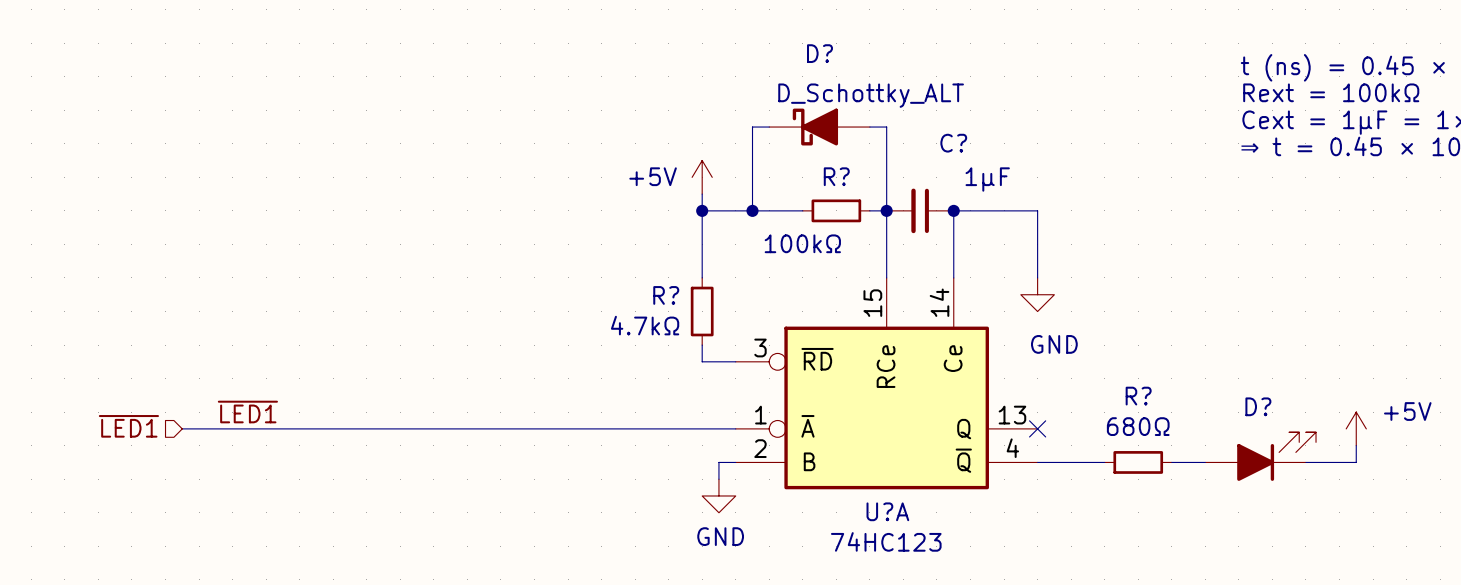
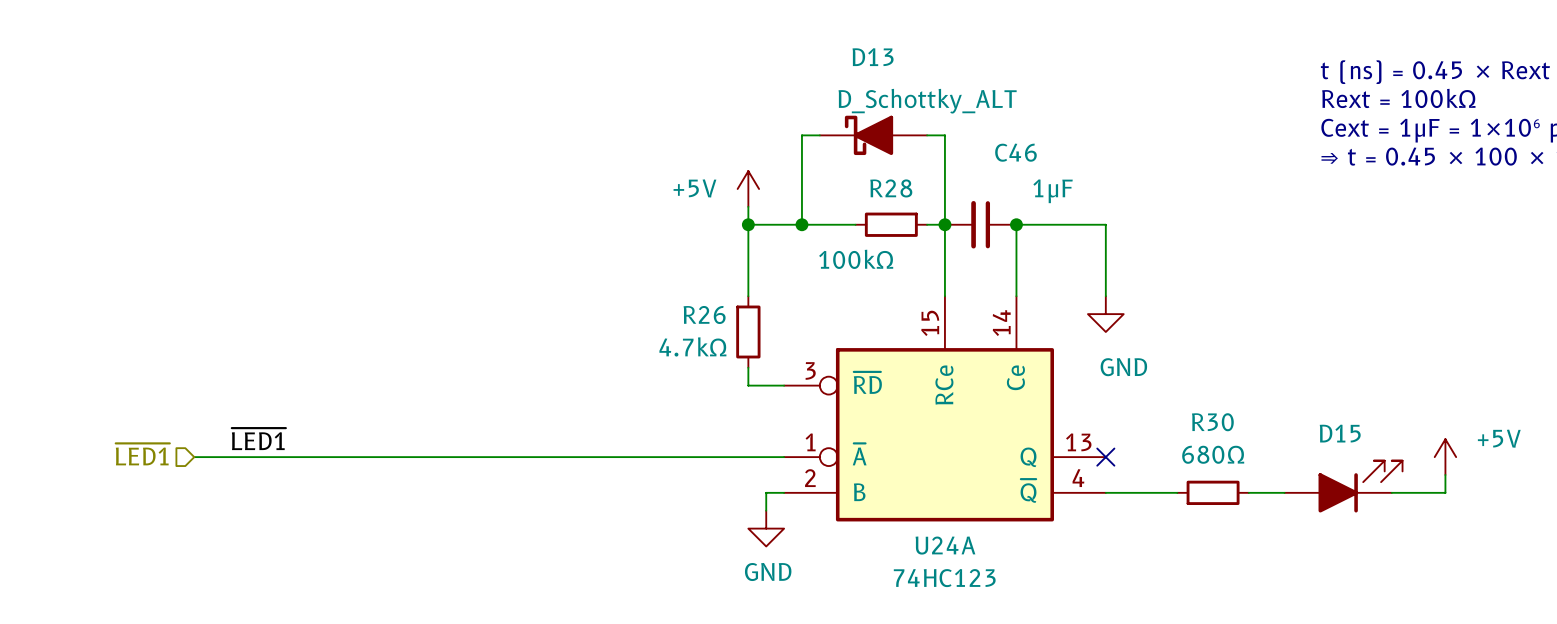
D? name: D? (819, 53) -> D13 (873, 57)
C? name: C? (953, 143) -> C46 (1015, 152)
R? name: R? (836, 176) -> R28 (891, 188)
R? name: R? (666, 295) -> R26 (704, 314)
R? name: R? (1138, 396) -> R30 (1212, 422)
D? name: D? (1258, 406) -> D15 (1340, 433)
U?A name: U?A (887, 511) -> U24A (945, 545)

